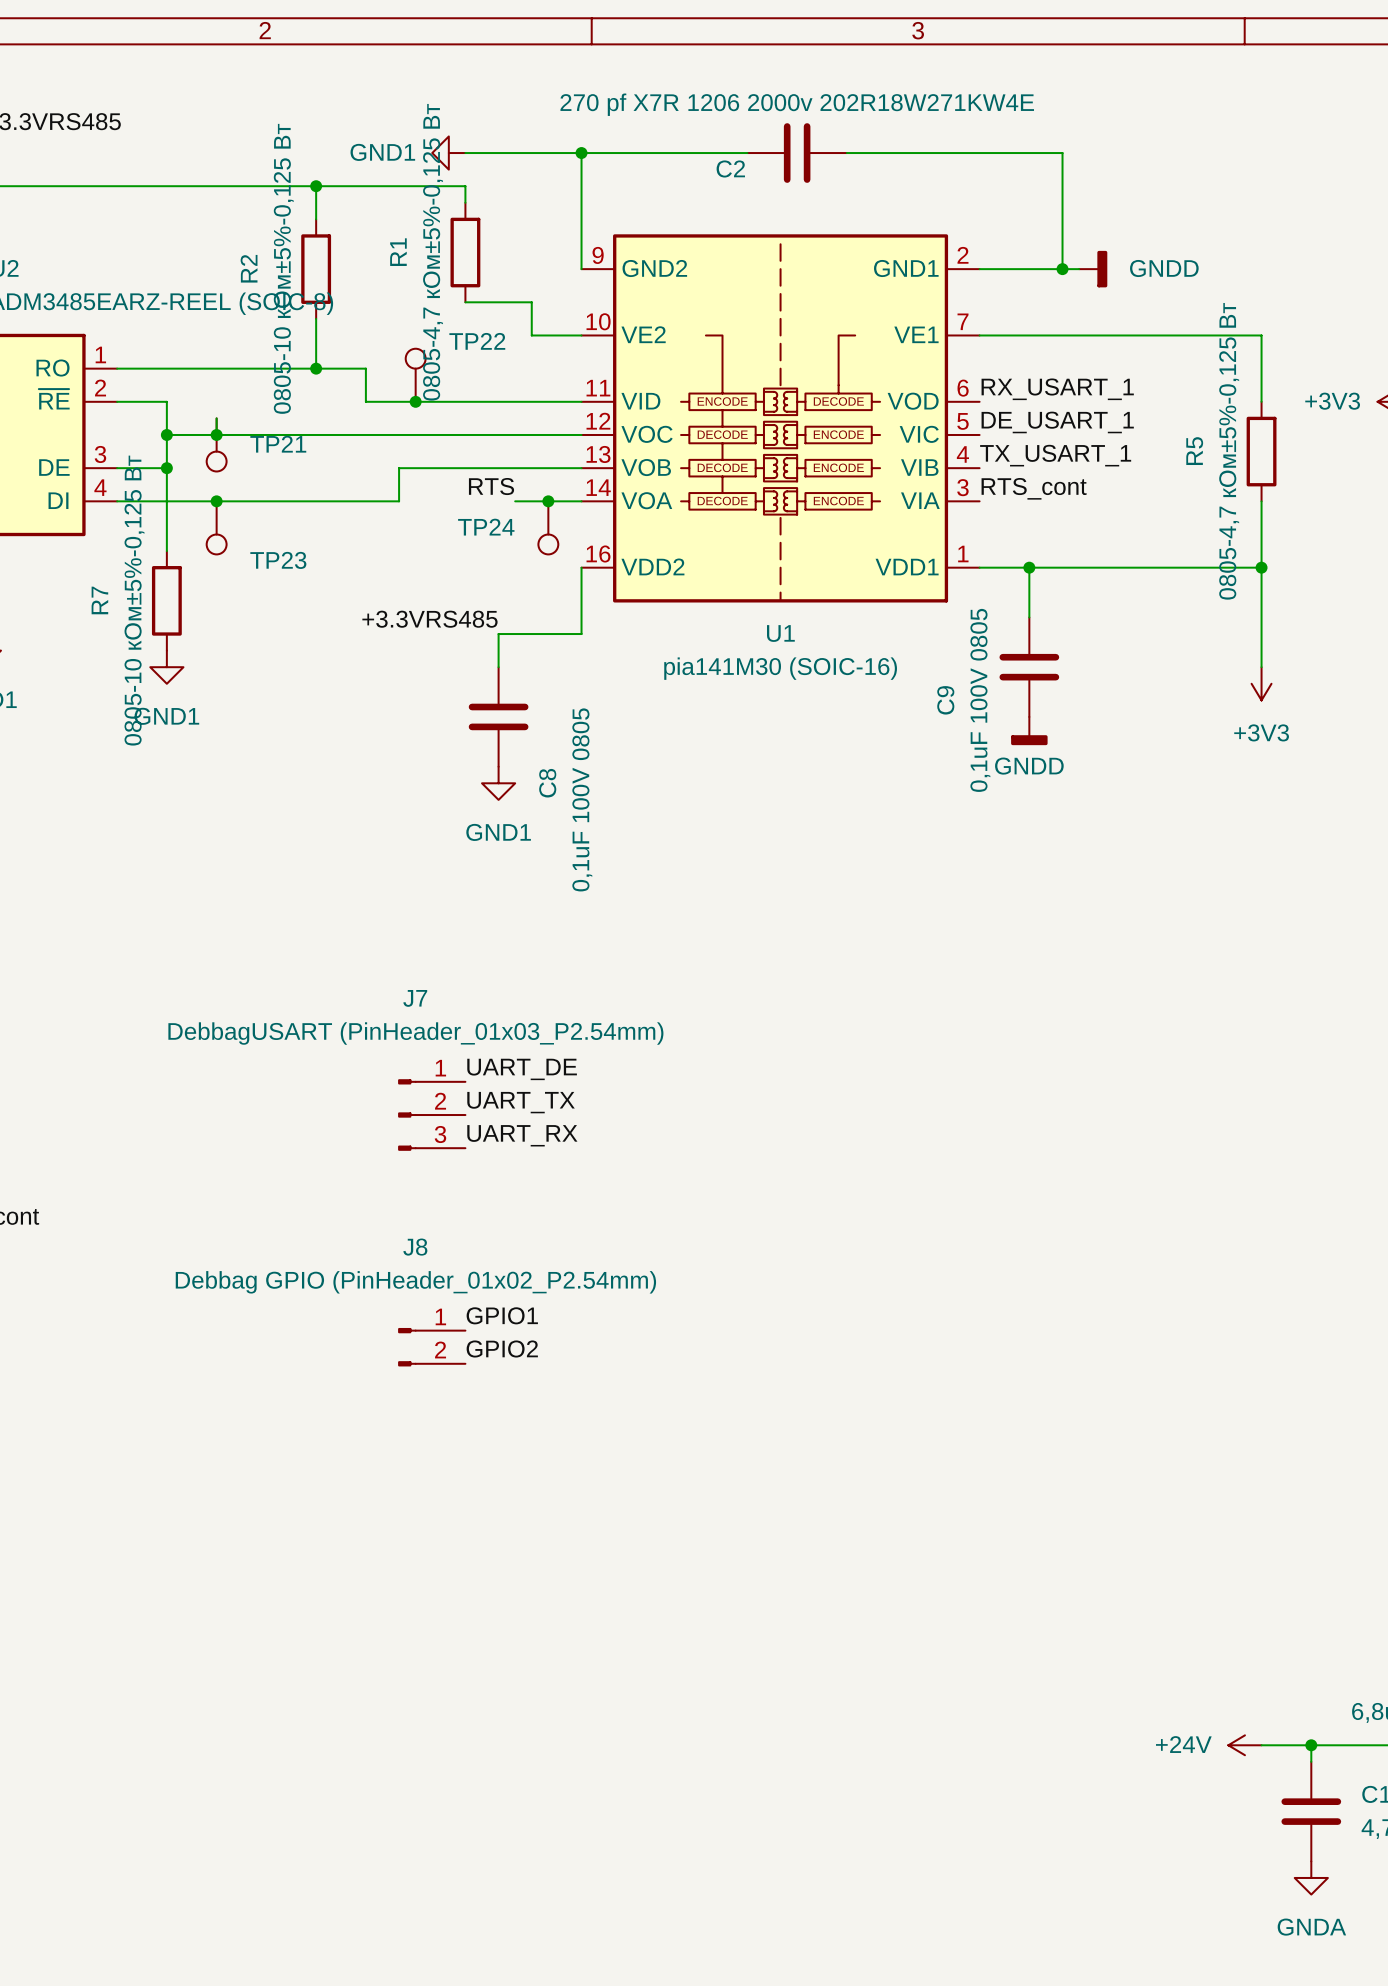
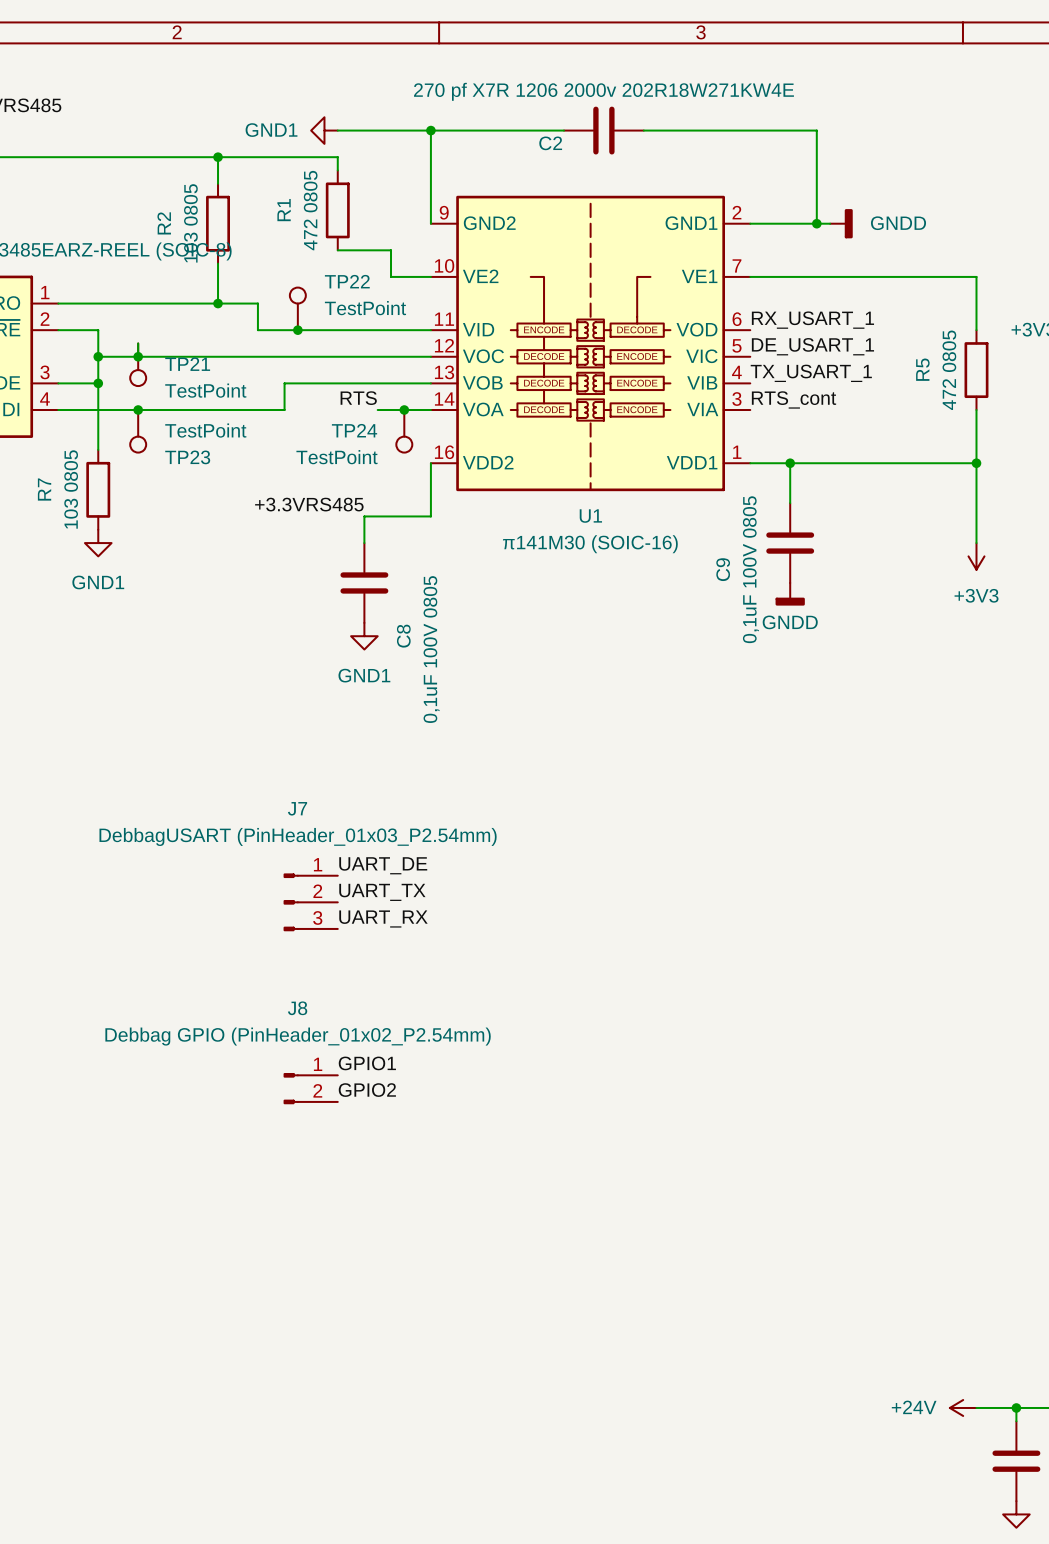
R1 value: 0805-4,7 кОм±5%-0,125 Вт (433, 252) -> 472 0805 (310, 210)
R2 value: 0805-10 кОм±5%-0,125 Вт (283, 268) -> 103 0805 (190, 223)
TP22 value: none -> TestPoint (365, 308)
R5 value: 0805-4,7 кОм±5%-0,125 Вт (1229, 451) -> 472 0805 (949, 370)
TP21 value: none -> TestPoint (205, 390)
TP23 value: none -> TestPoint (205, 430)
TP24 value: none -> TestPoint (336, 457)
R7 value: 0805-10 кОм±5%-0,125 Вт (134, 600) -> 103 0805 (71, 489)
U1 value: pia141M30 (SOIC-16) (780, 668) -> π141M30 (SOIC-16) (590, 544)

